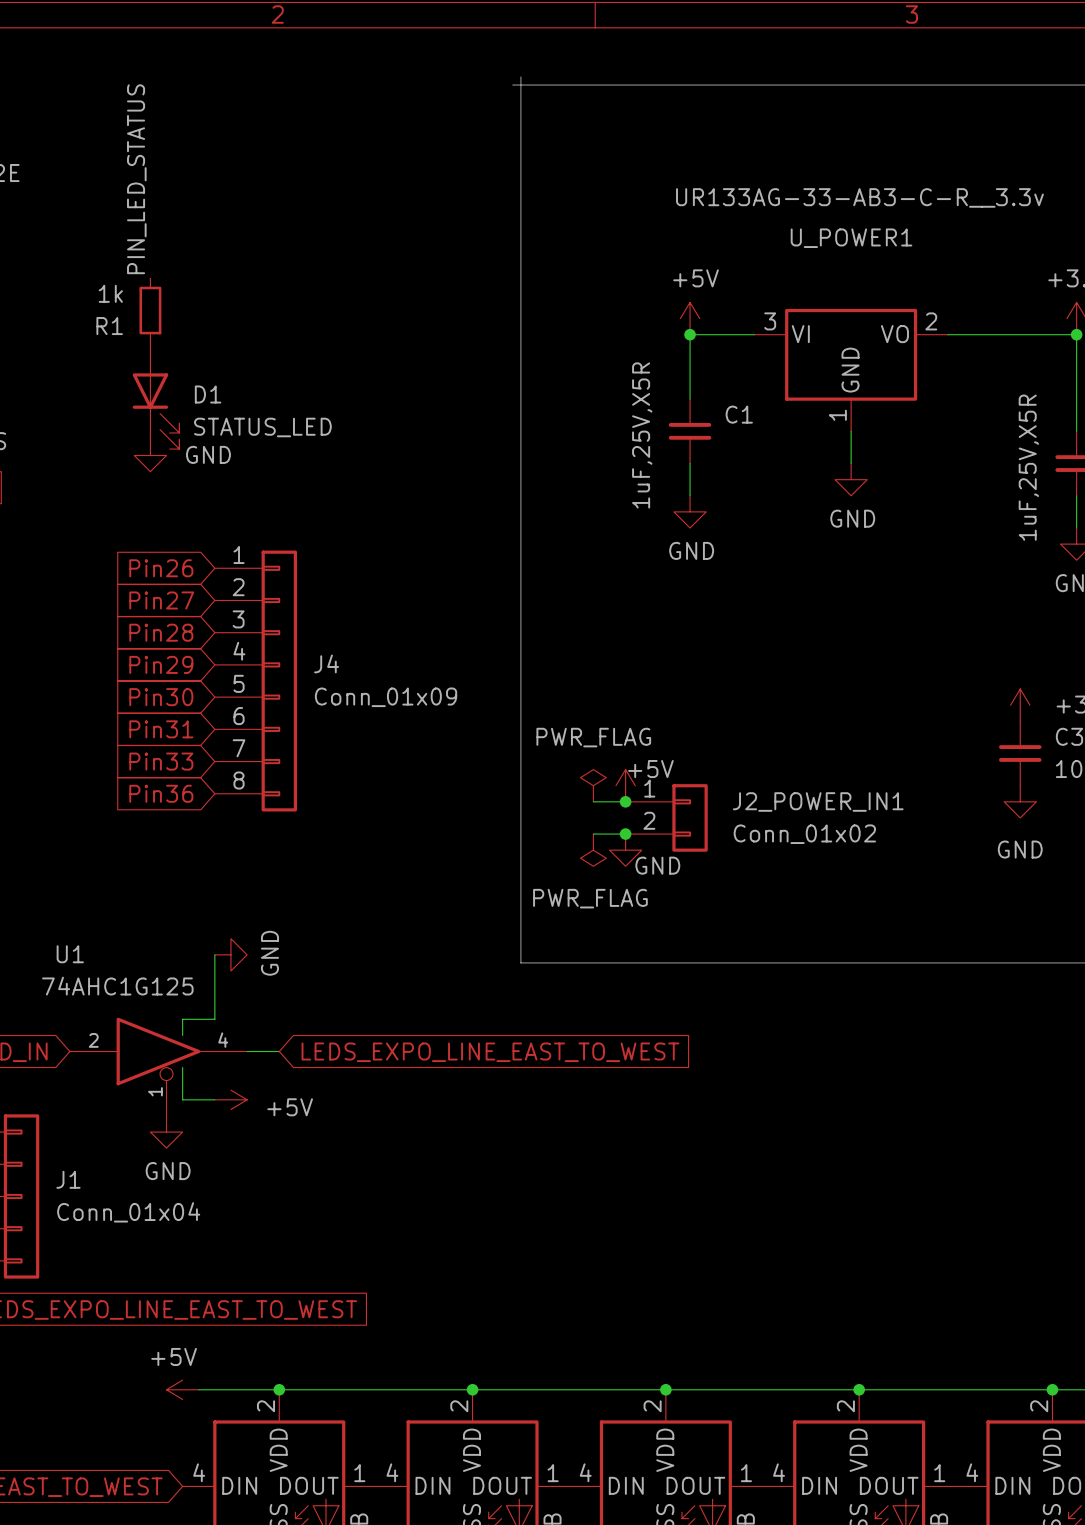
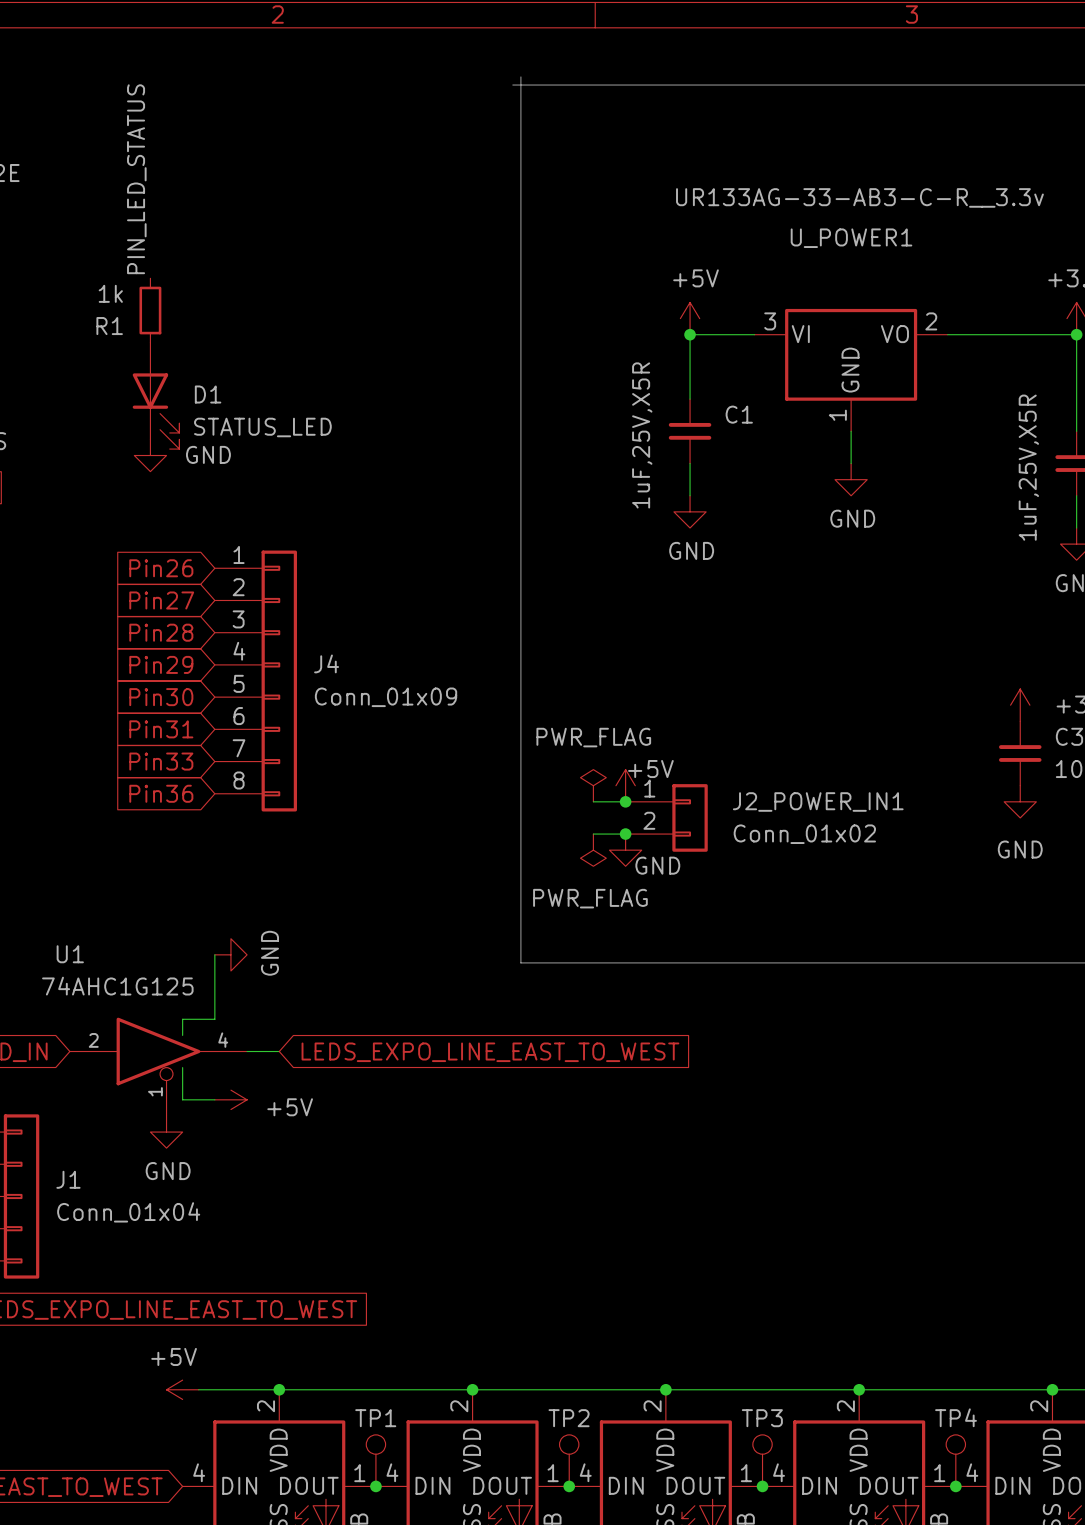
TP1: none -> (375, 1460)
TP2: none -> (569, 1460)
TP3: none -> (762, 1460)
TP4: none -> (955, 1460)
junction: none -> (375, 1486)
junction: none -> (569, 1486)
junction: none -> (762, 1486)
junction: none -> (955, 1486)

